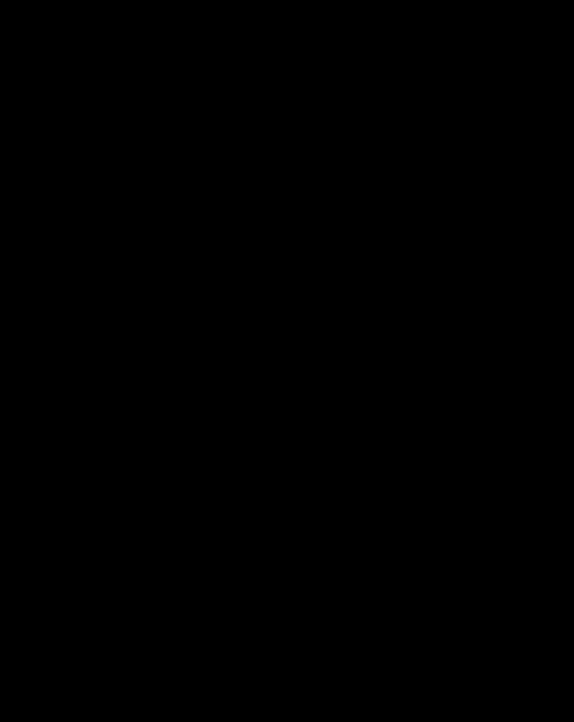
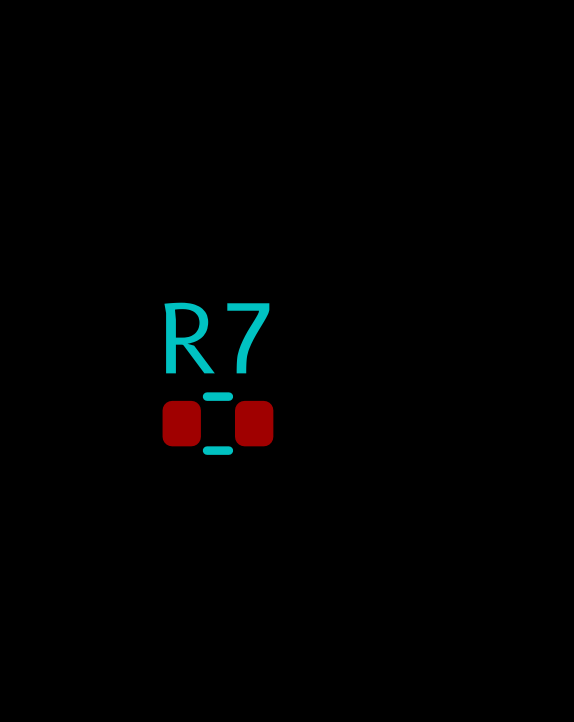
R7: none -> (217, 423)

